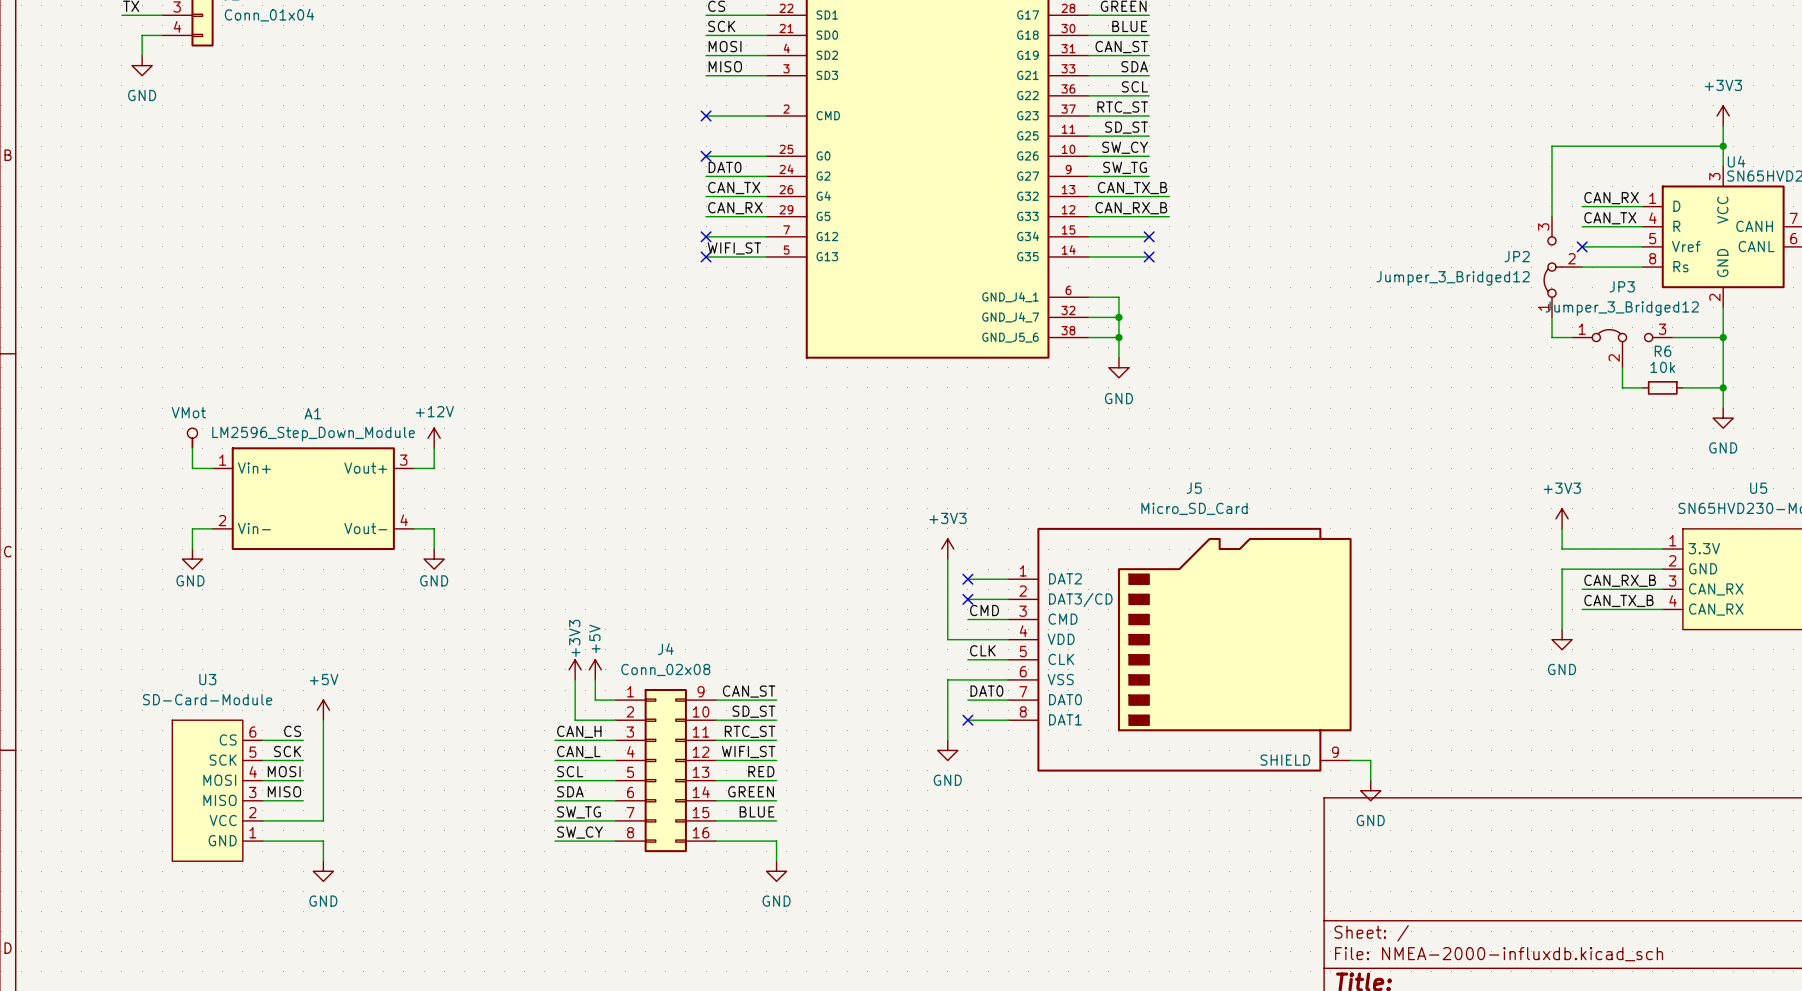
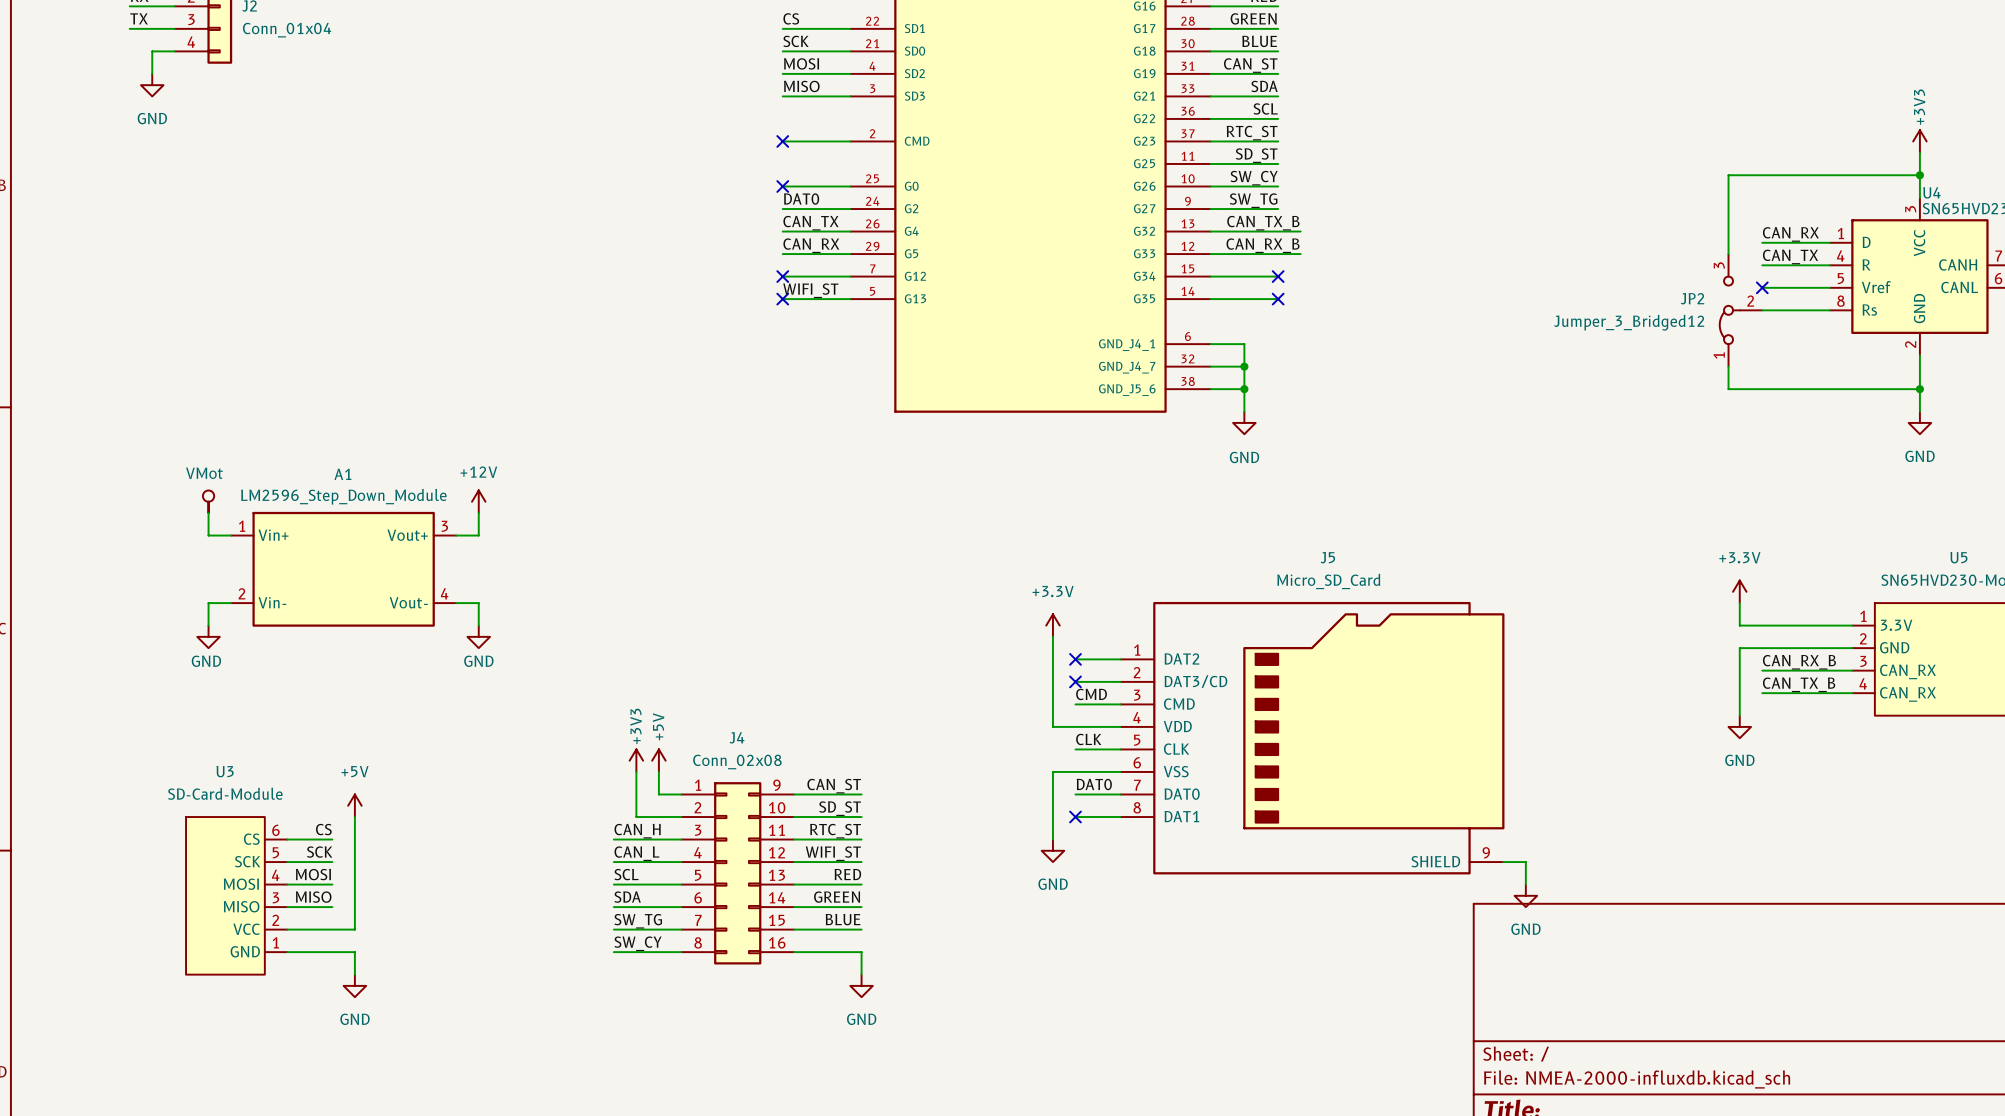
power symbol text rotation: 0° (1723, 85) -> 90° counterclockwise (1919, 107)
wire: none -> (1751, 389) (1863, 389)
JP3: Jumper_3_Bridged12 (1622, 348) -> none
wire: (1723, 357) (1723, 408) -> none
wire: (1622, 367) (1622, 387) (1642, 387) -> none
R6: 10k (1662, 387) -> none
wire: (1682, 387) (1723, 387) -> none
junction: (1723, 387) -> none
power symbol position: GND (1723, 418) -> GND (1919, 422)
power symbol: +3V3 (1562, 518) -> +3.3V (1739, 591)
power symbol: +3V3 (947, 549) -> +3.3V (1052, 625)

